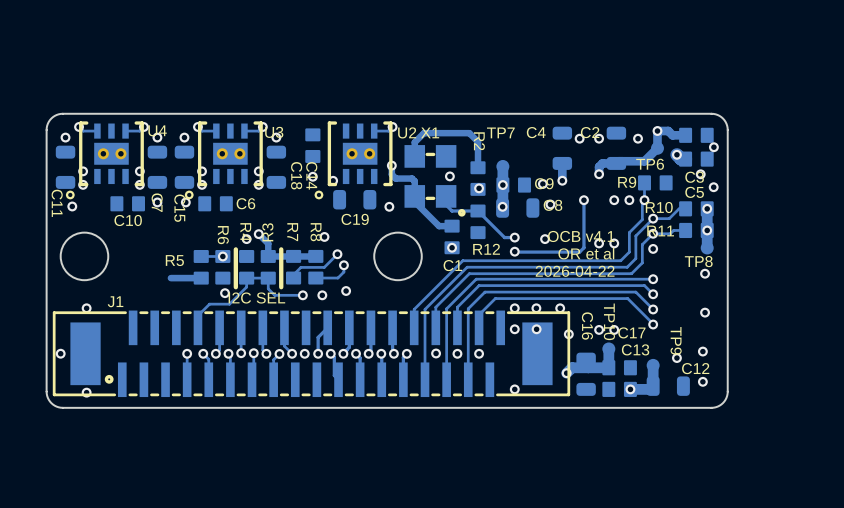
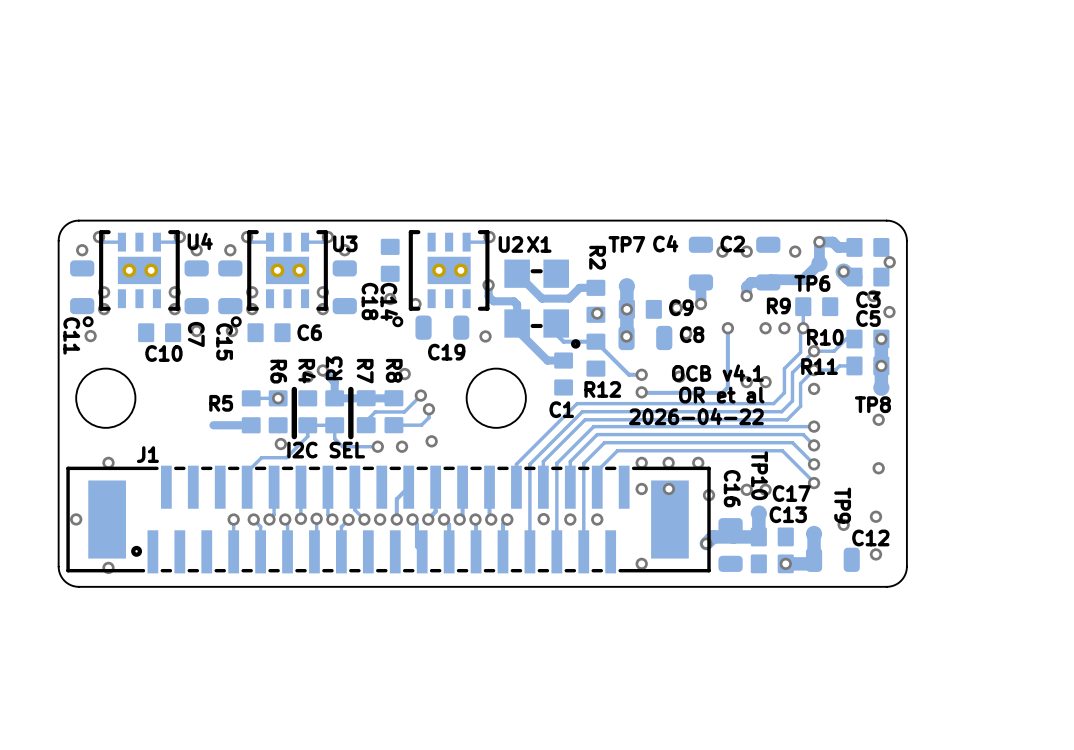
track: (414, 156) (414, 142) (423, 133) (469, 133) (478, 141) (478, 167) -> (517, 273) (542, 298) (568, 298) (579, 287) (595, 287)
via: (449, 176) -> none
via: (452, 247) -> none

